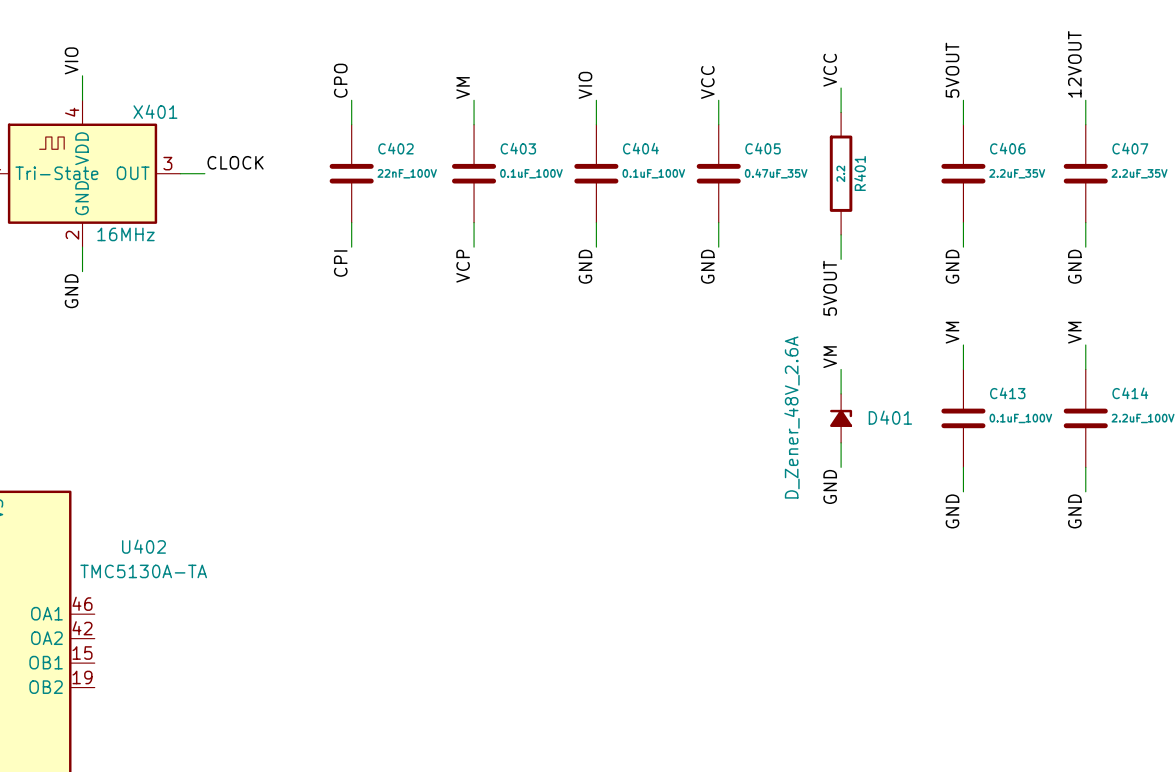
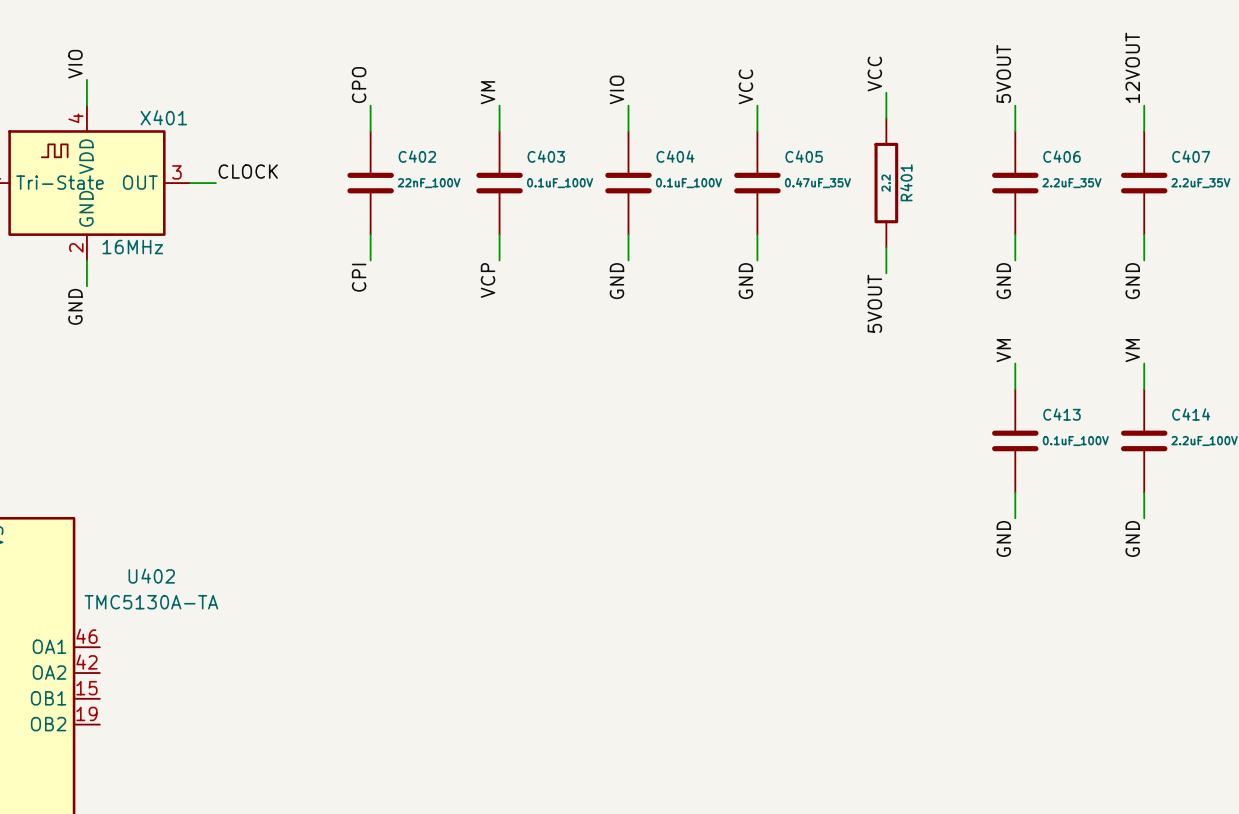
label: VM (830, 357) -> none
wire: (841, 369) (841, 393) -> none
D401: D_Zener_48V_2.6A (841, 418) -> none
wire: (841, 442) (841, 467) -> none
label: GND (830, 486) -> none

